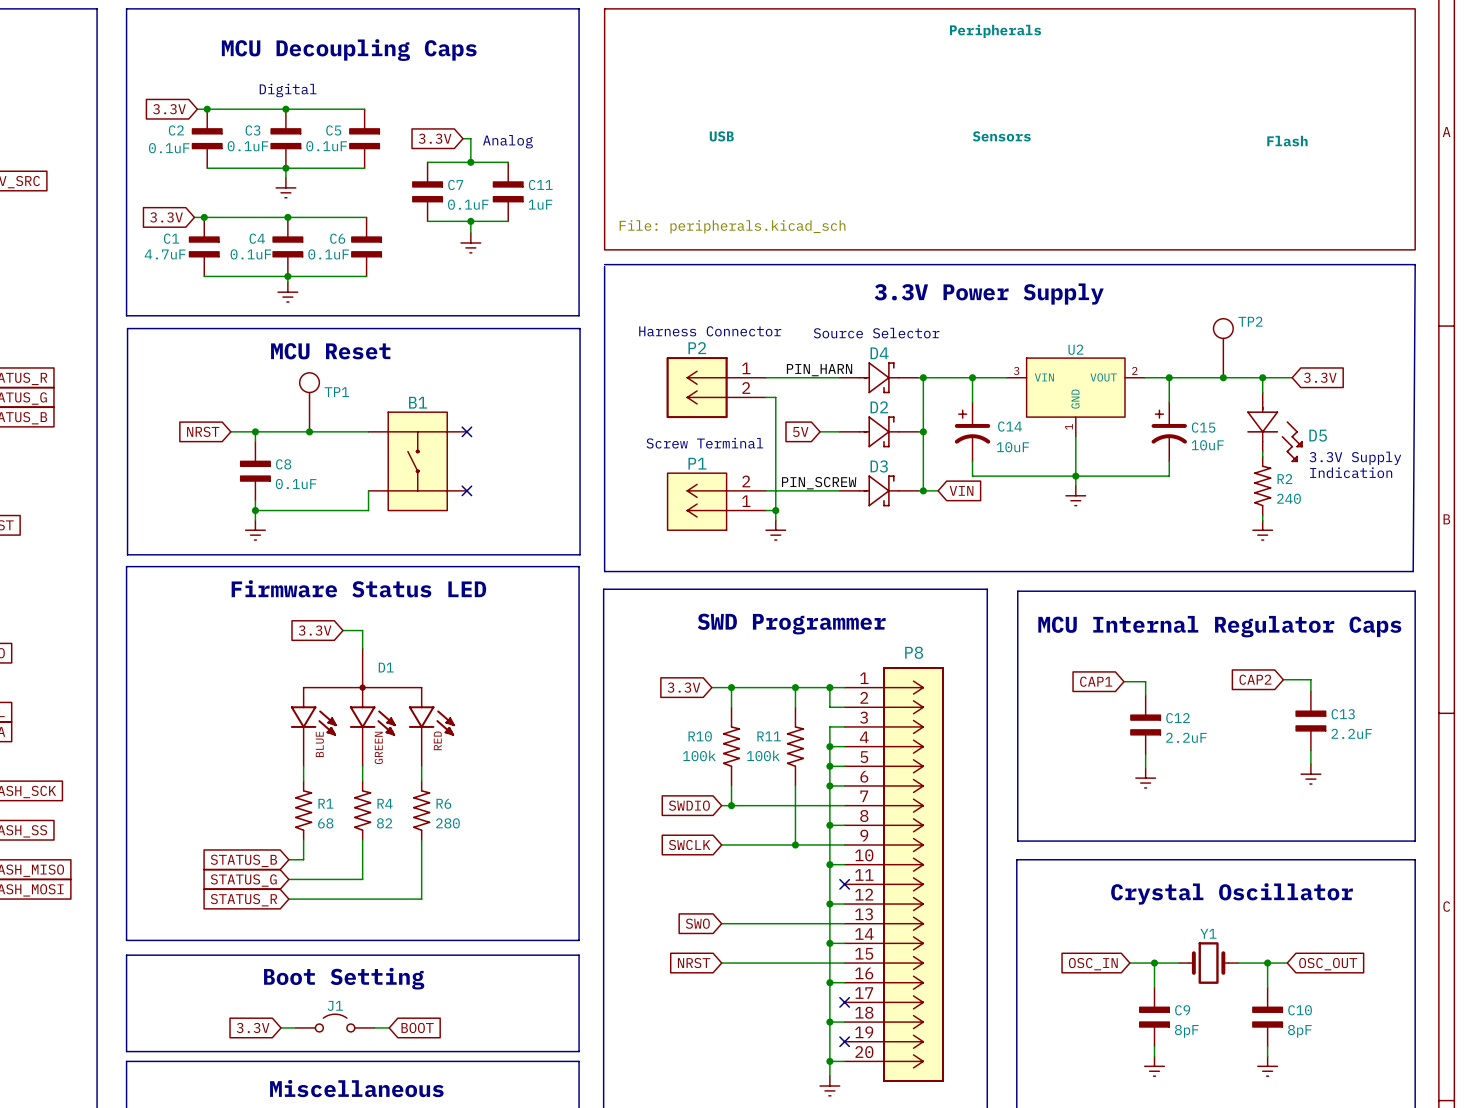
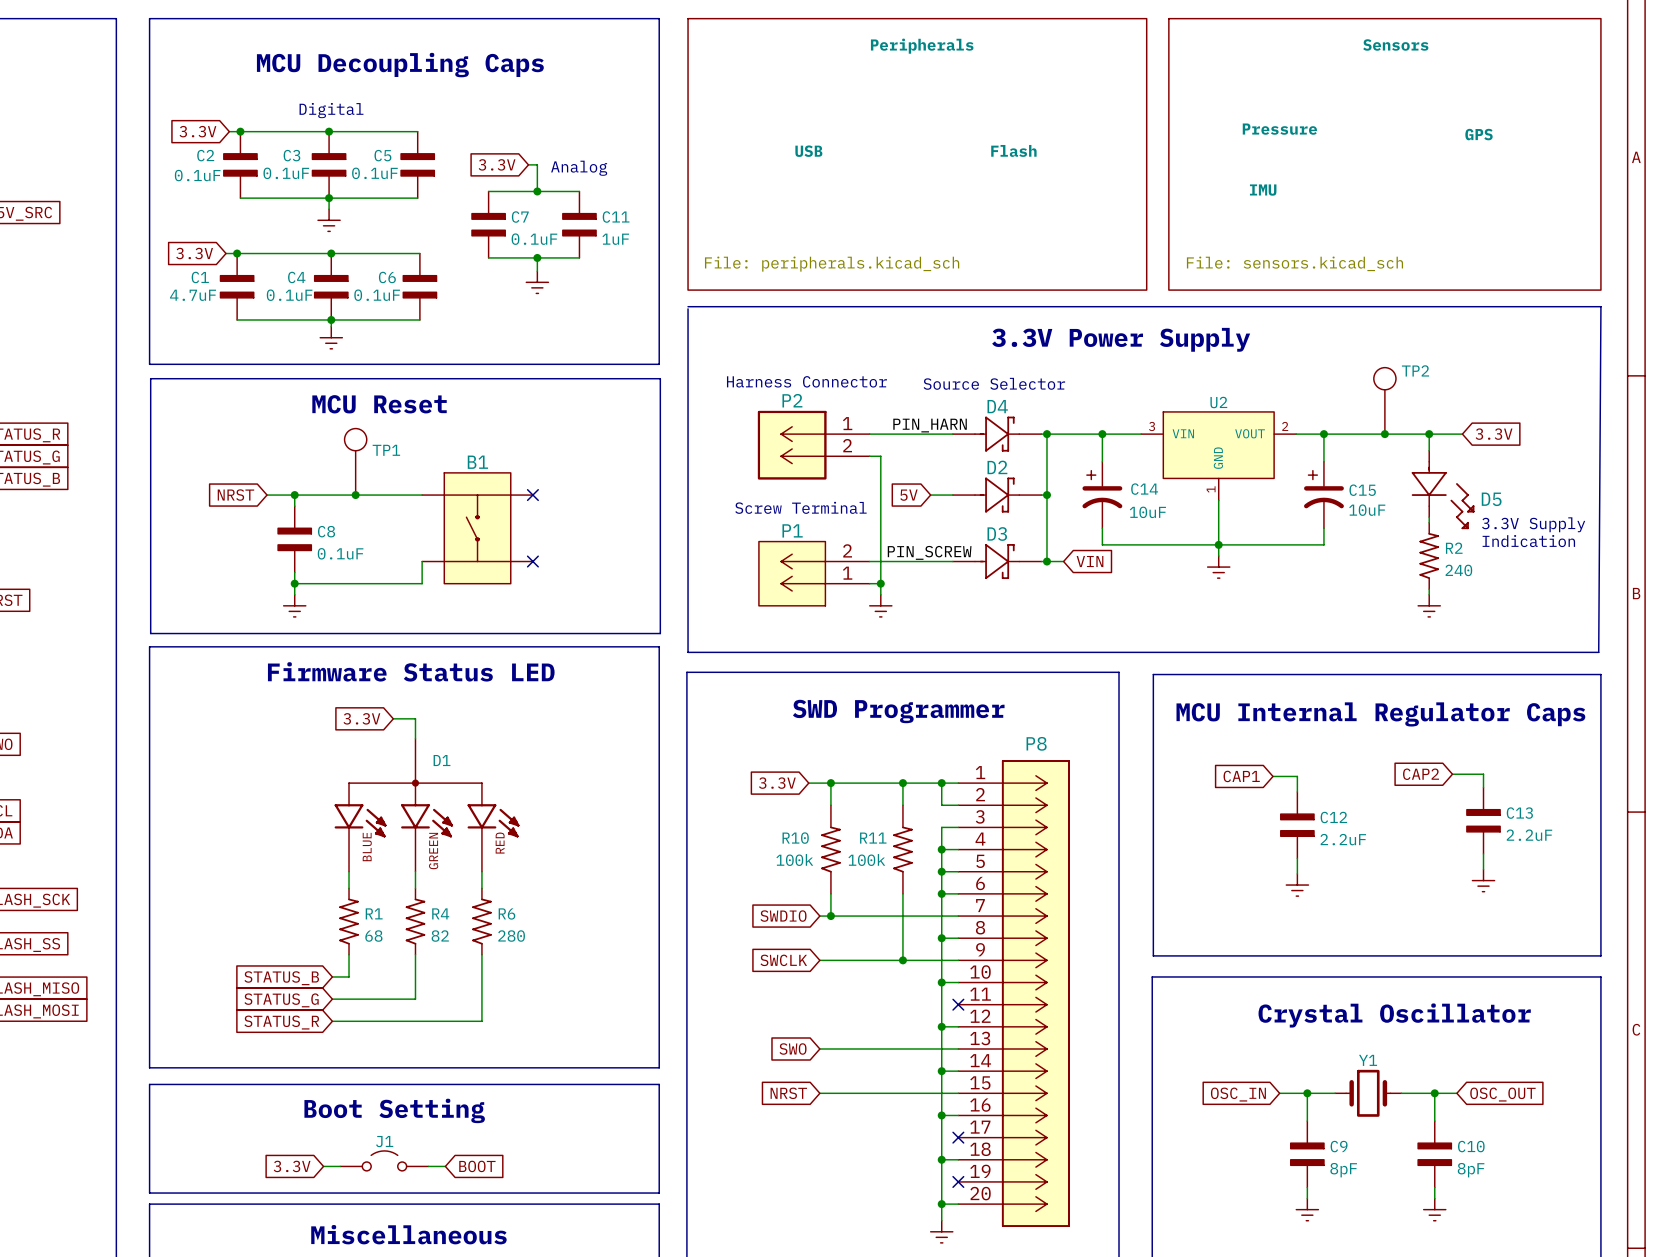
sheet Peripherals: none -> File: peripherals.kicad_sch (917, 154)
sheet Peripherals: File: peripherals.kicad_sch (1009, 129) -> none
sheet Sensors: none -> File: sensors.kicad_sch (1384, 154)

